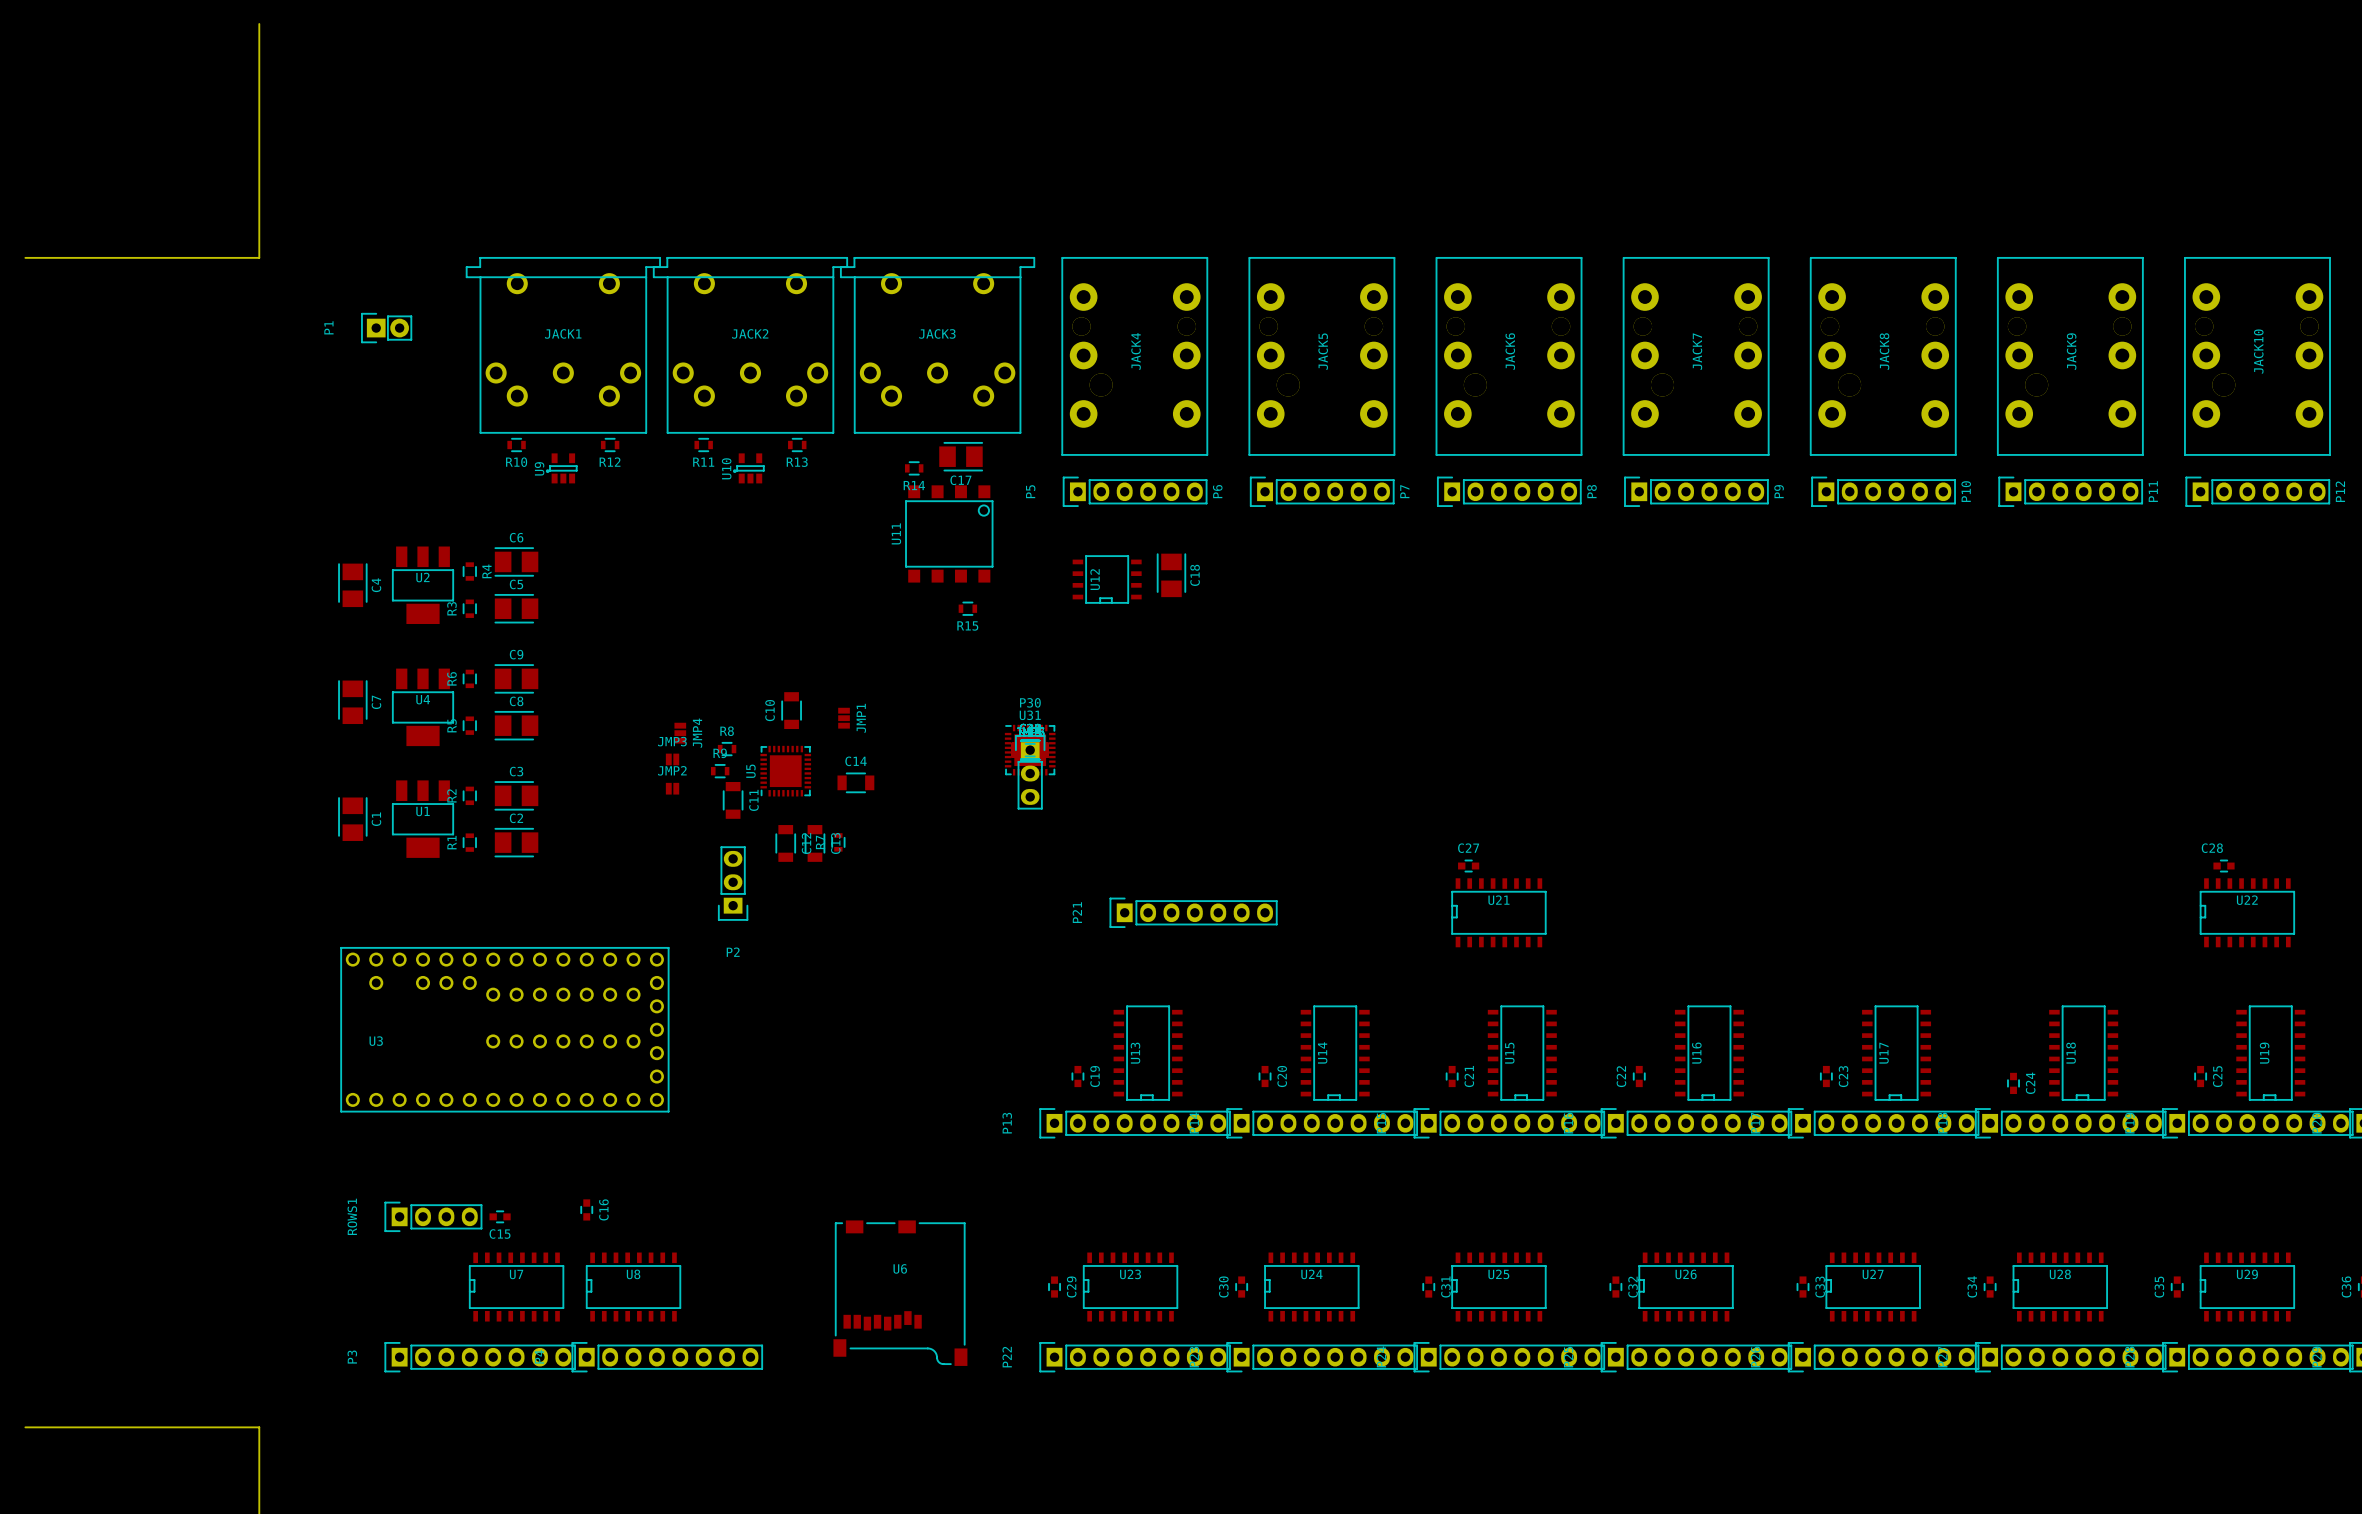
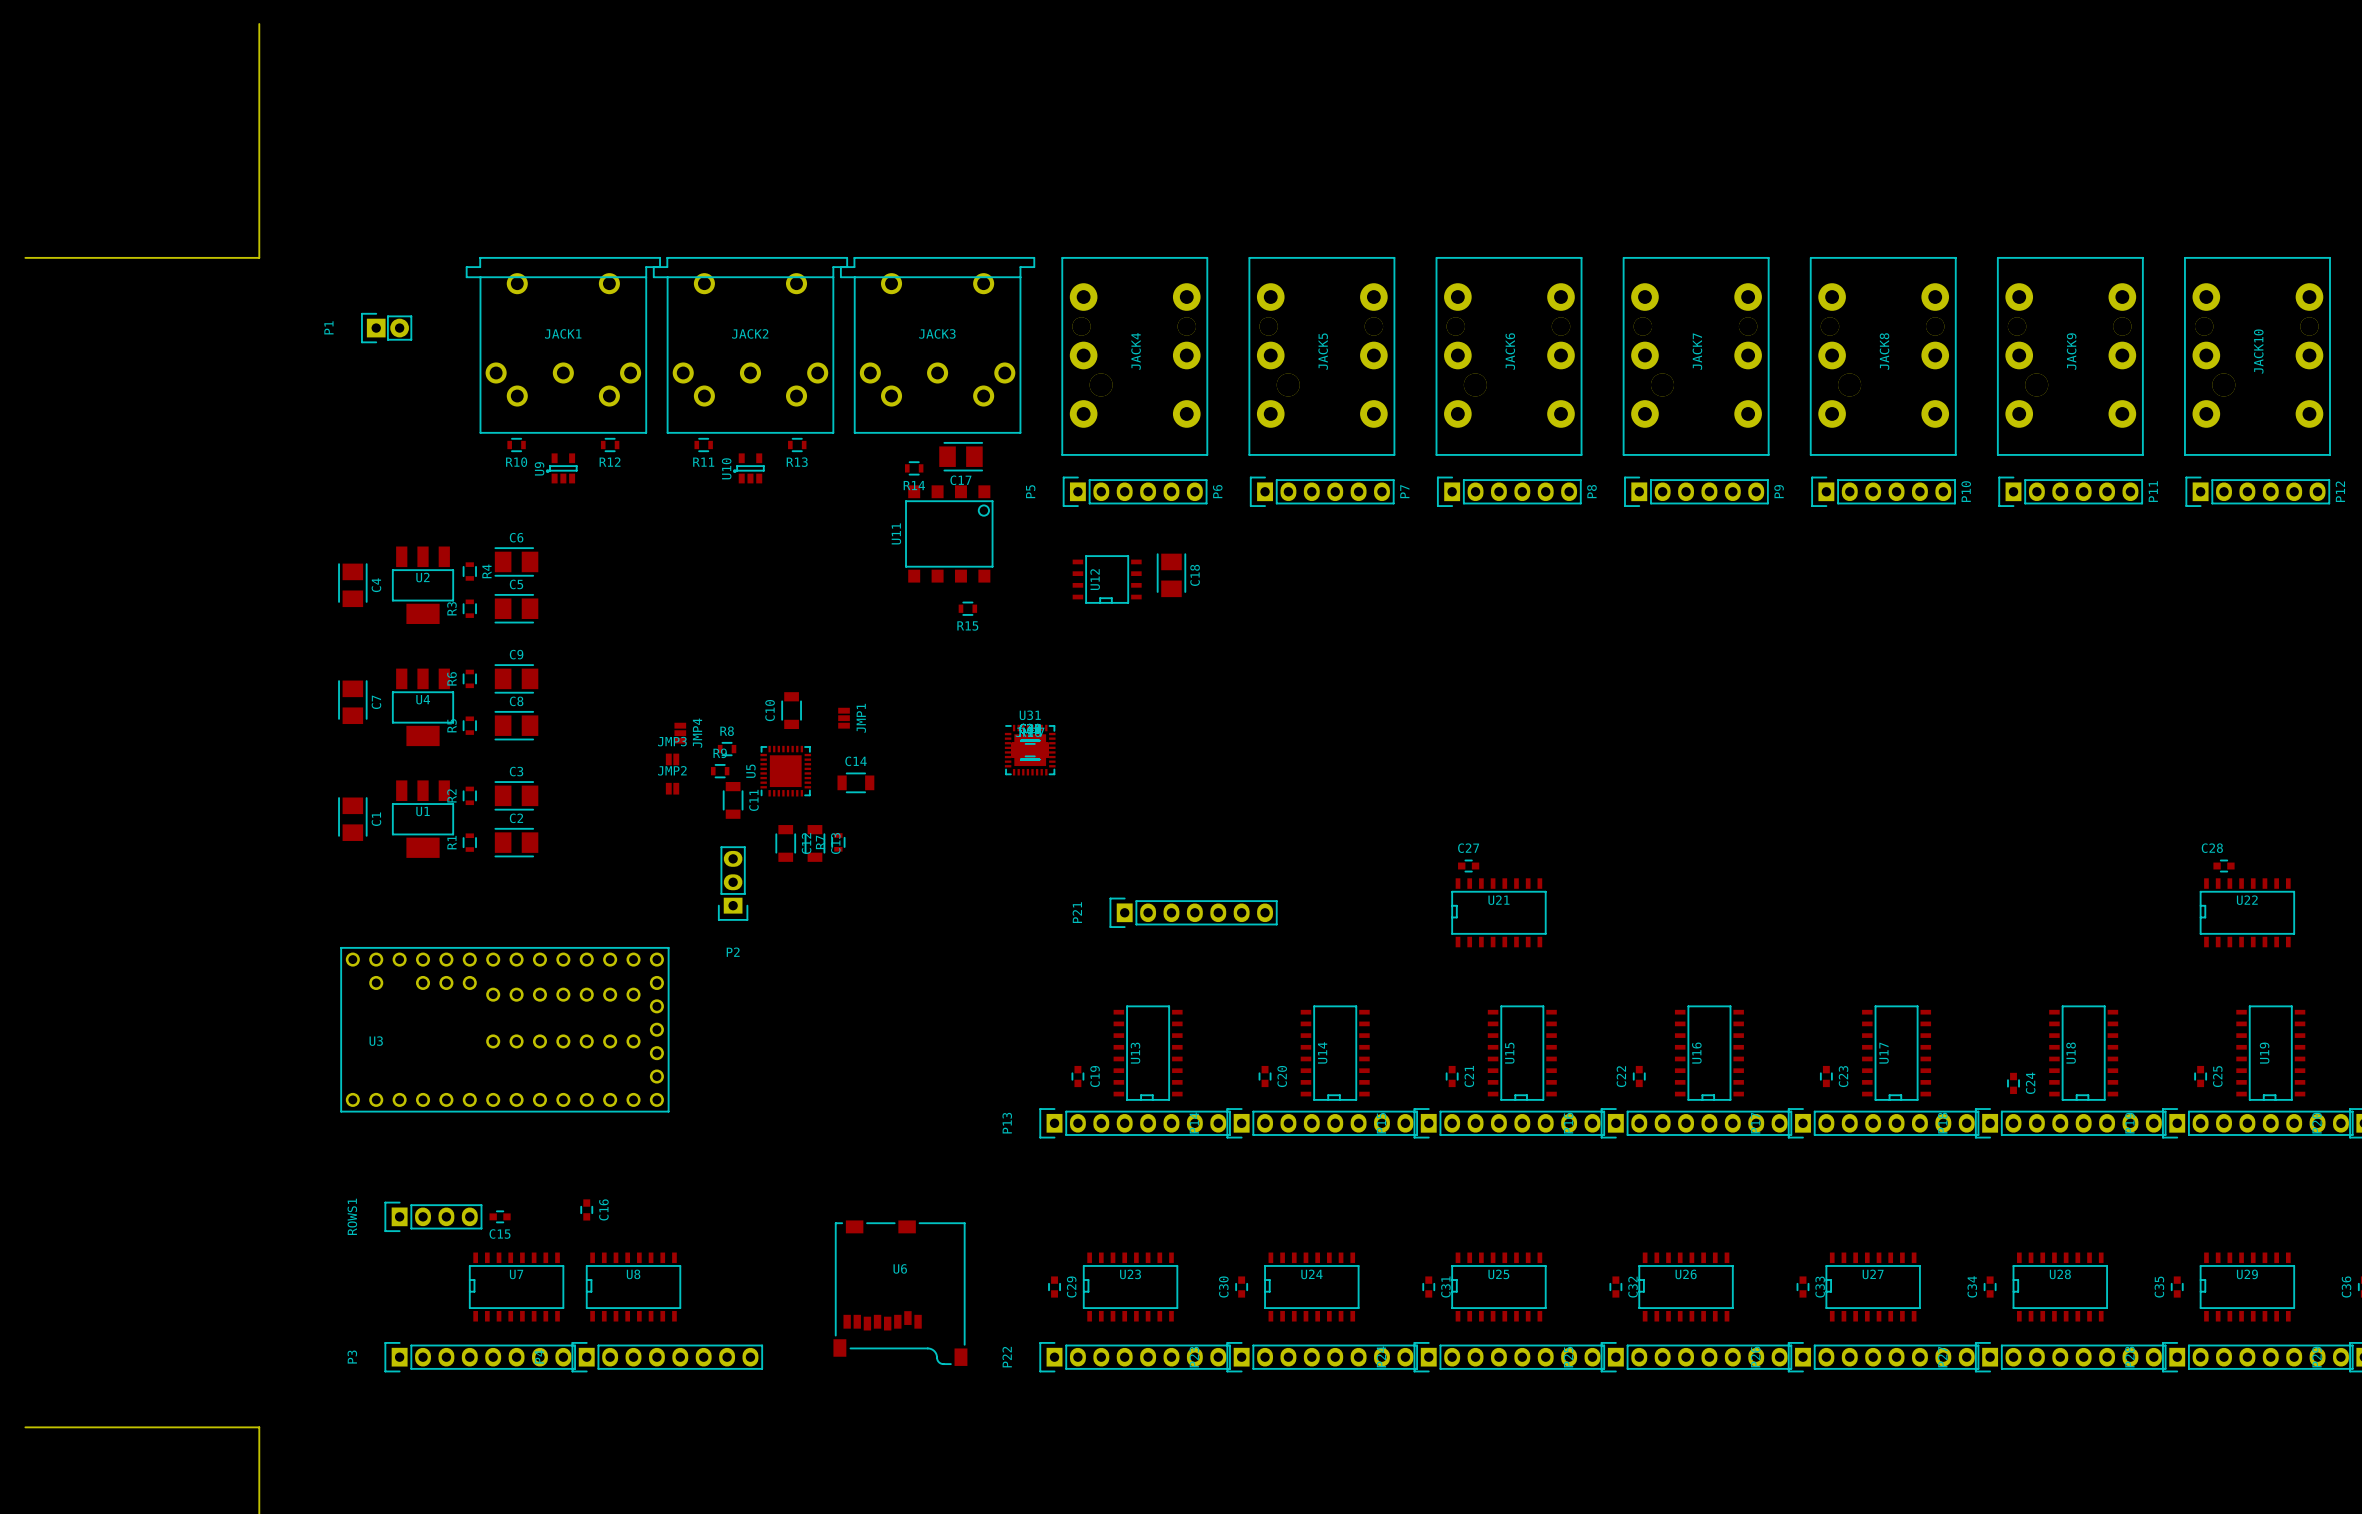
P30: (1030, 772) -> none

